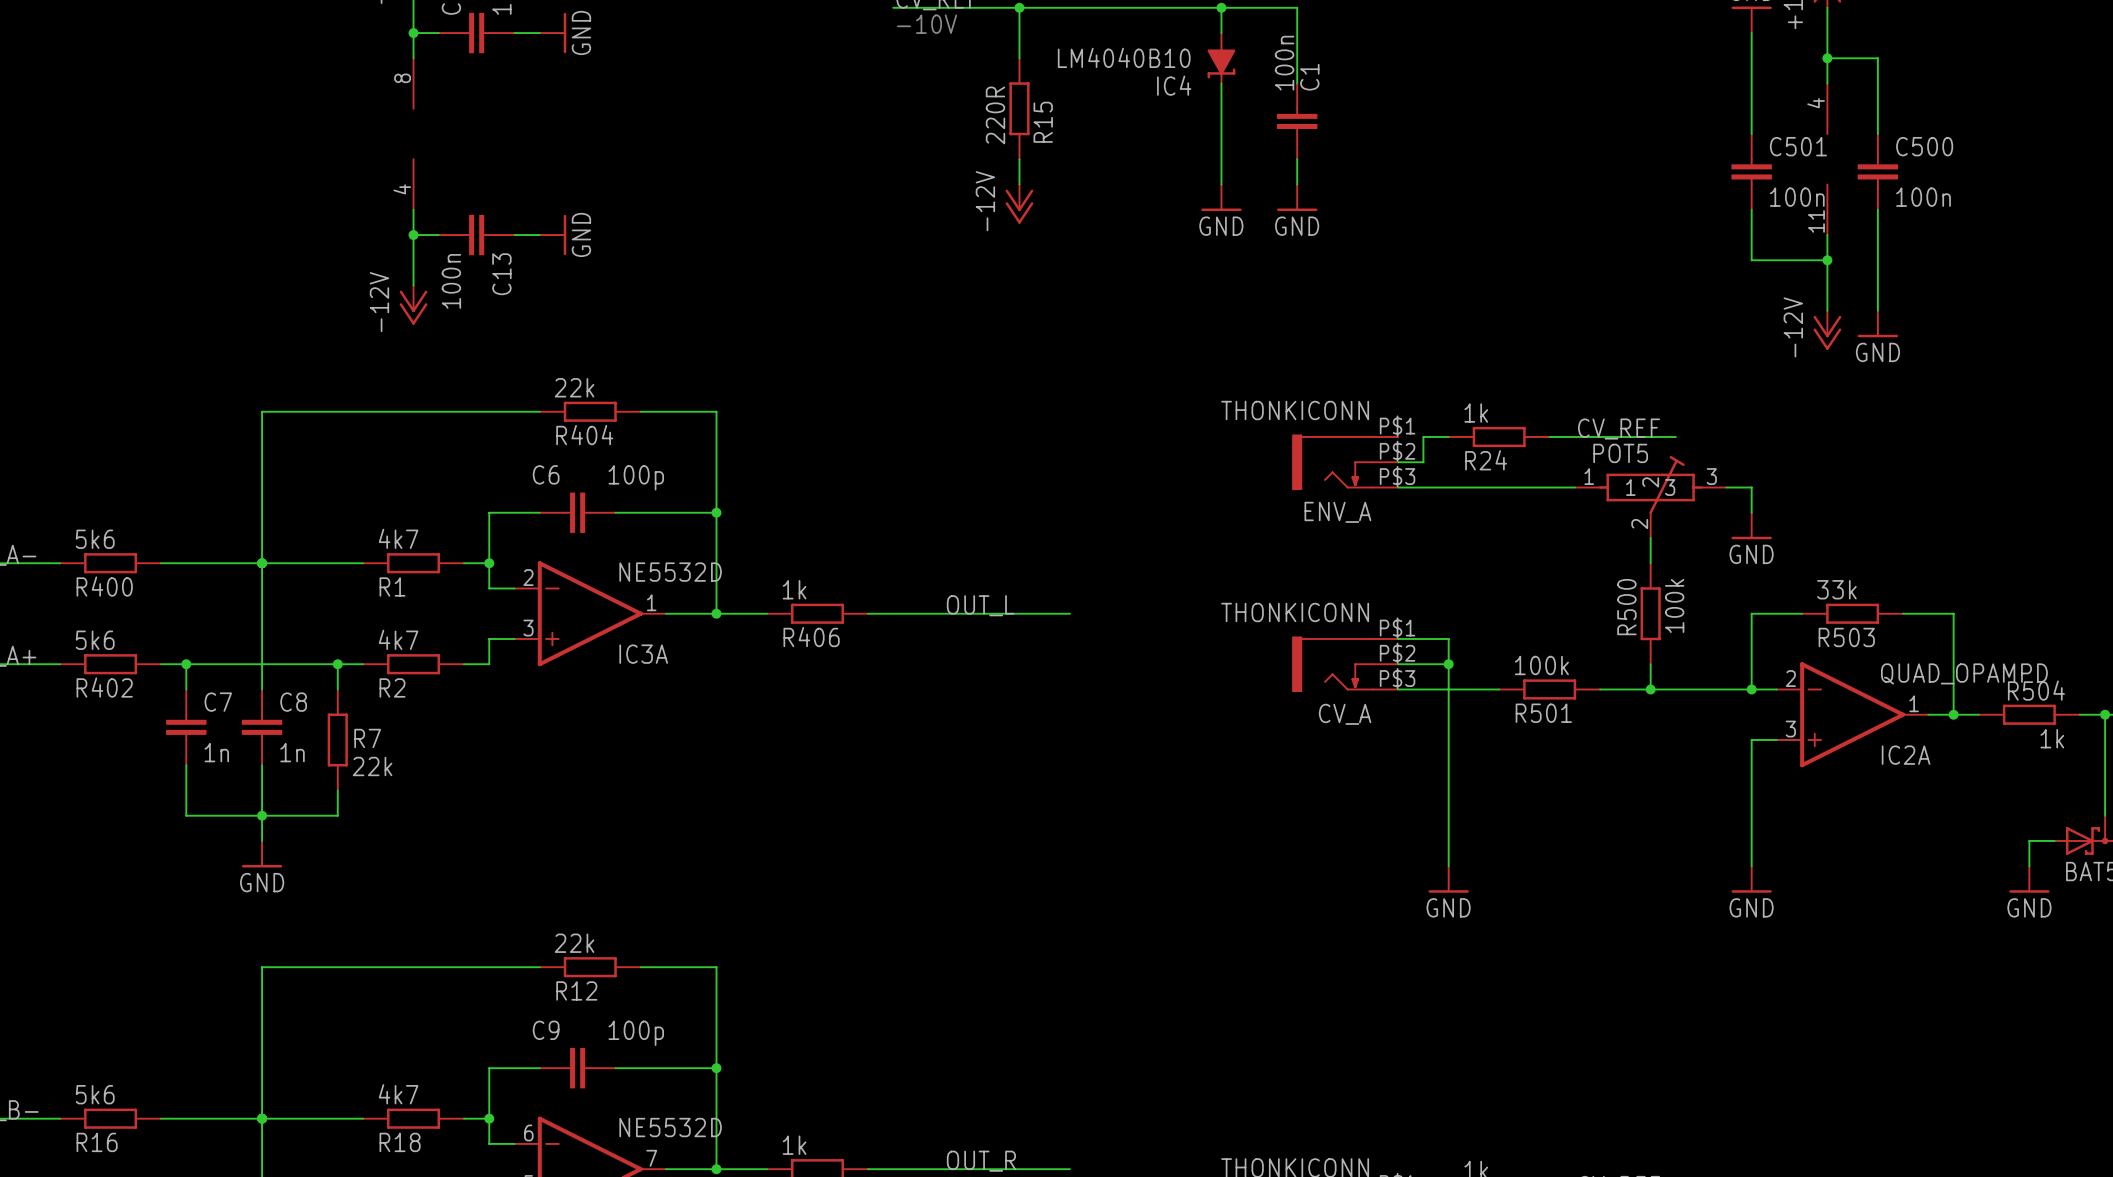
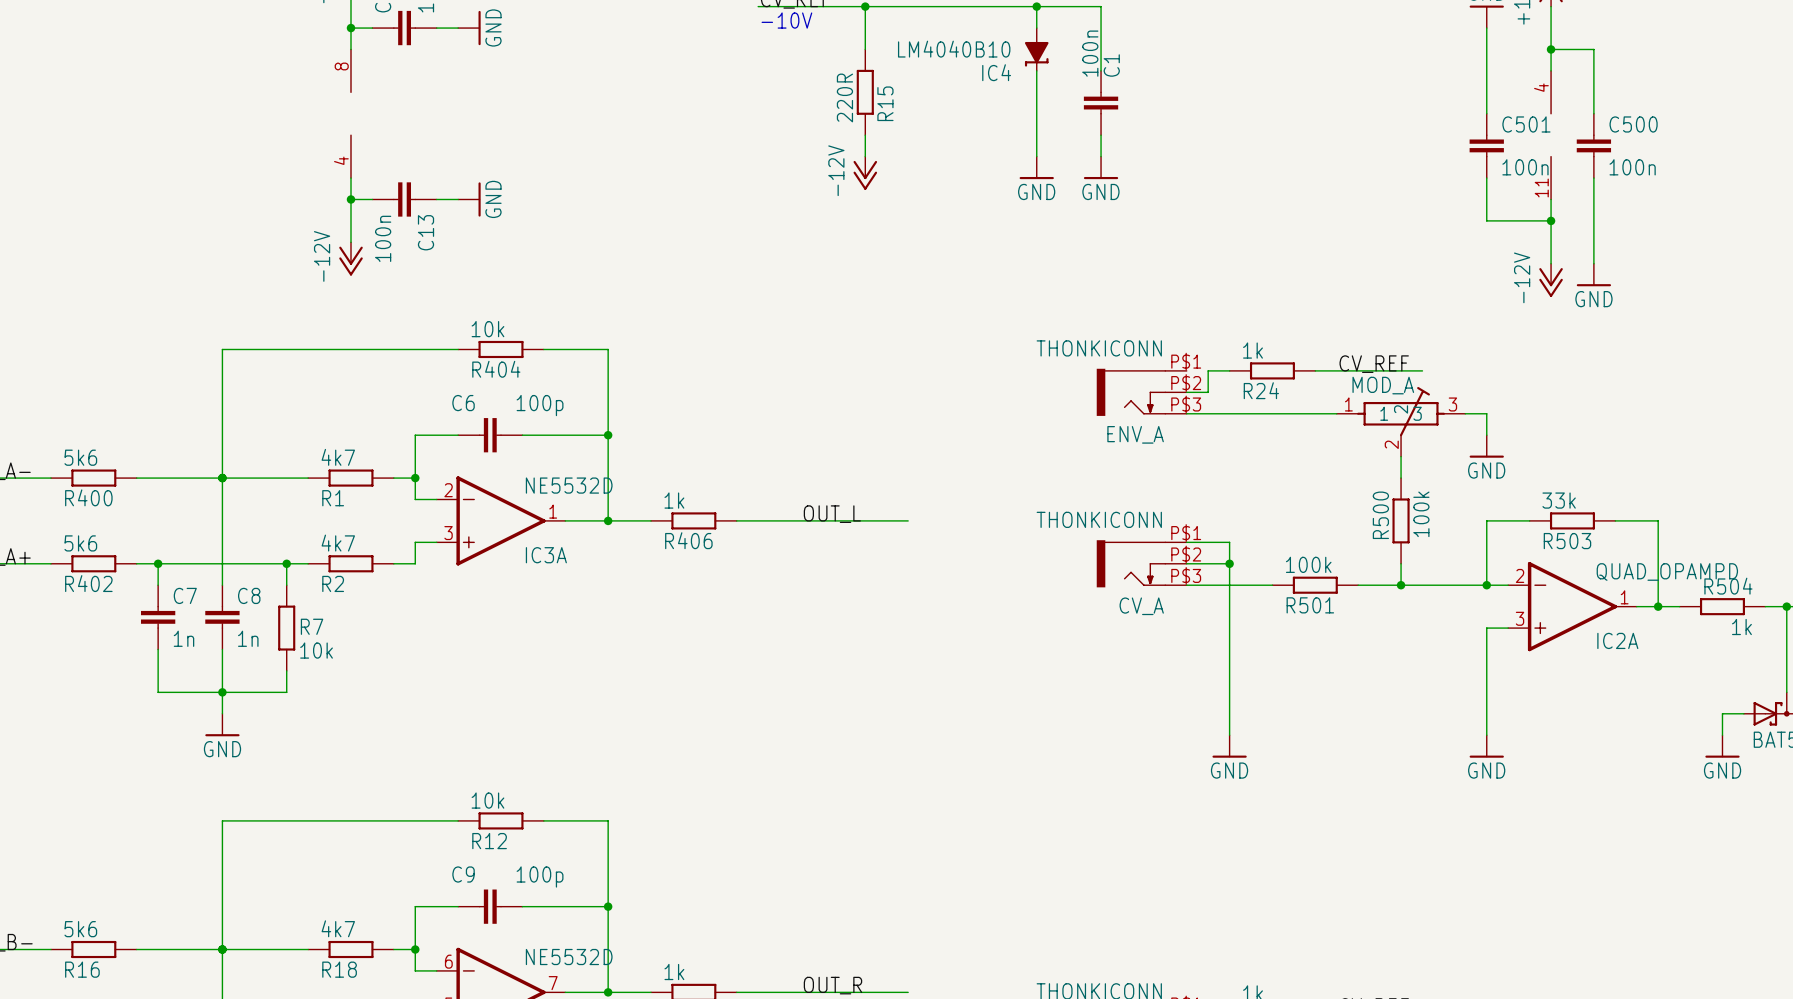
R404 value: 22k (574, 387) -> 10k (487, 329)
POT5 name: POT5 (1620, 453) -> MOD_A (1383, 385)
R7 value: 22k (372, 766) -> 10k (316, 650)
R12 value: 22k (574, 943) -> 10k (487, 800)

